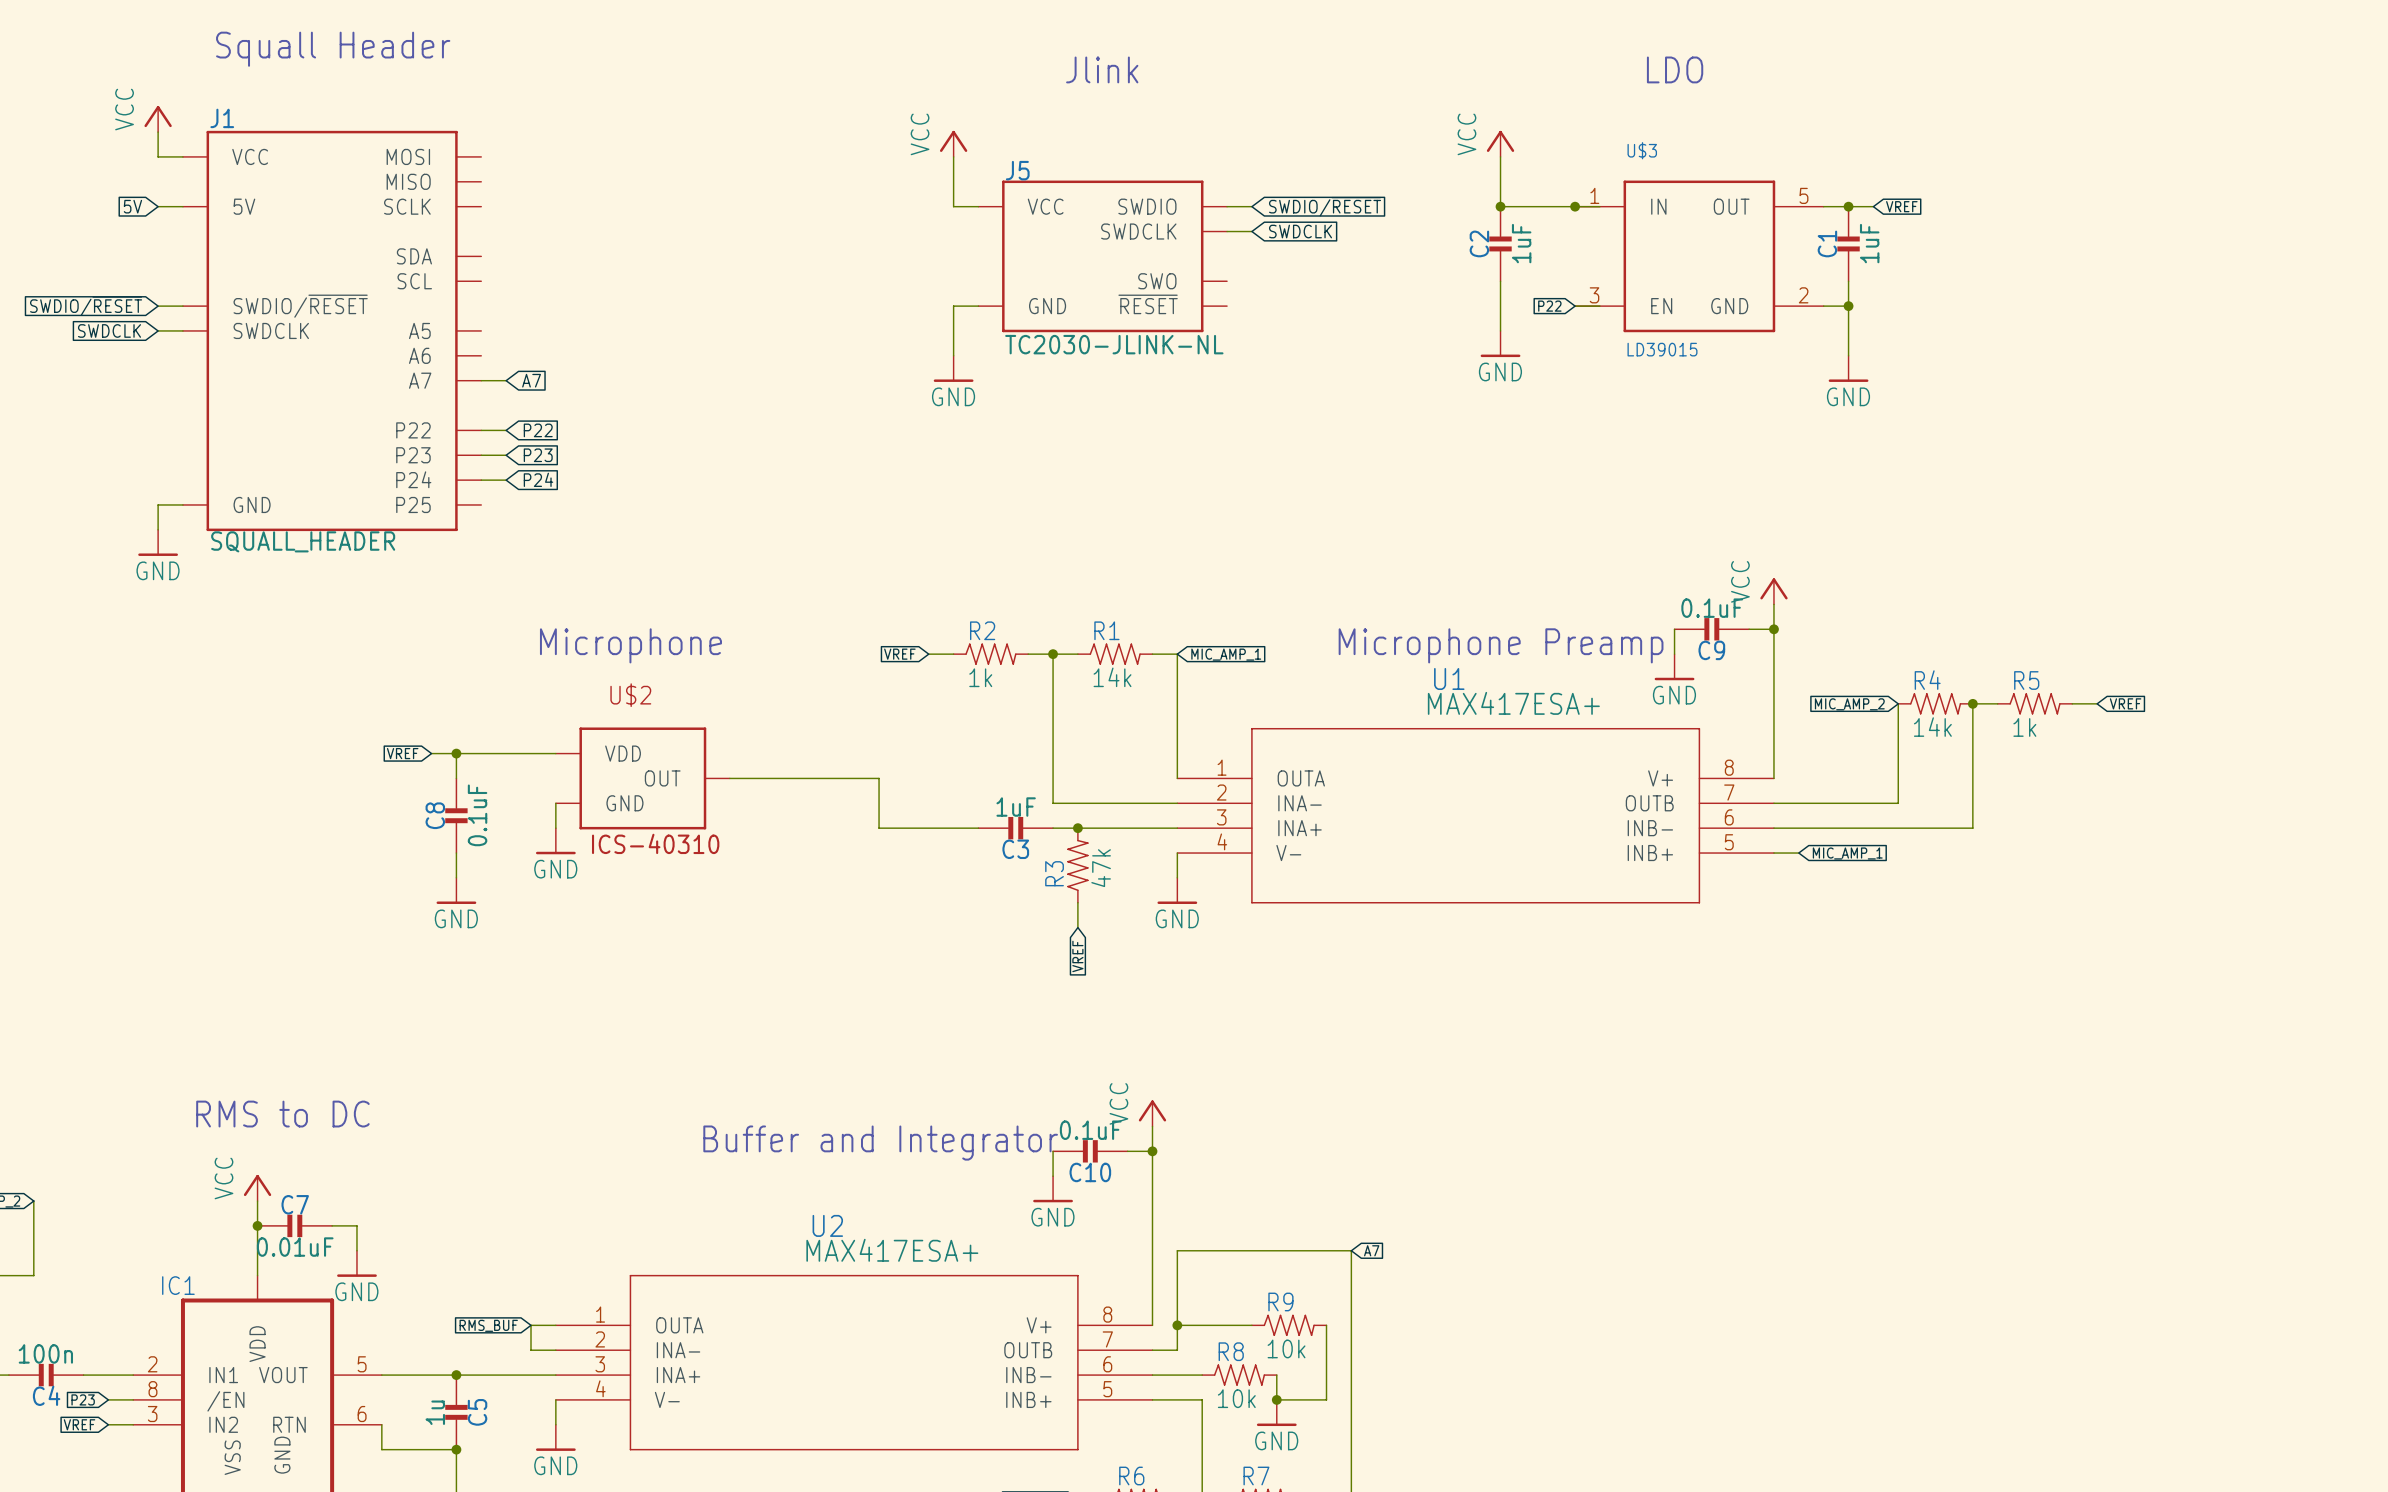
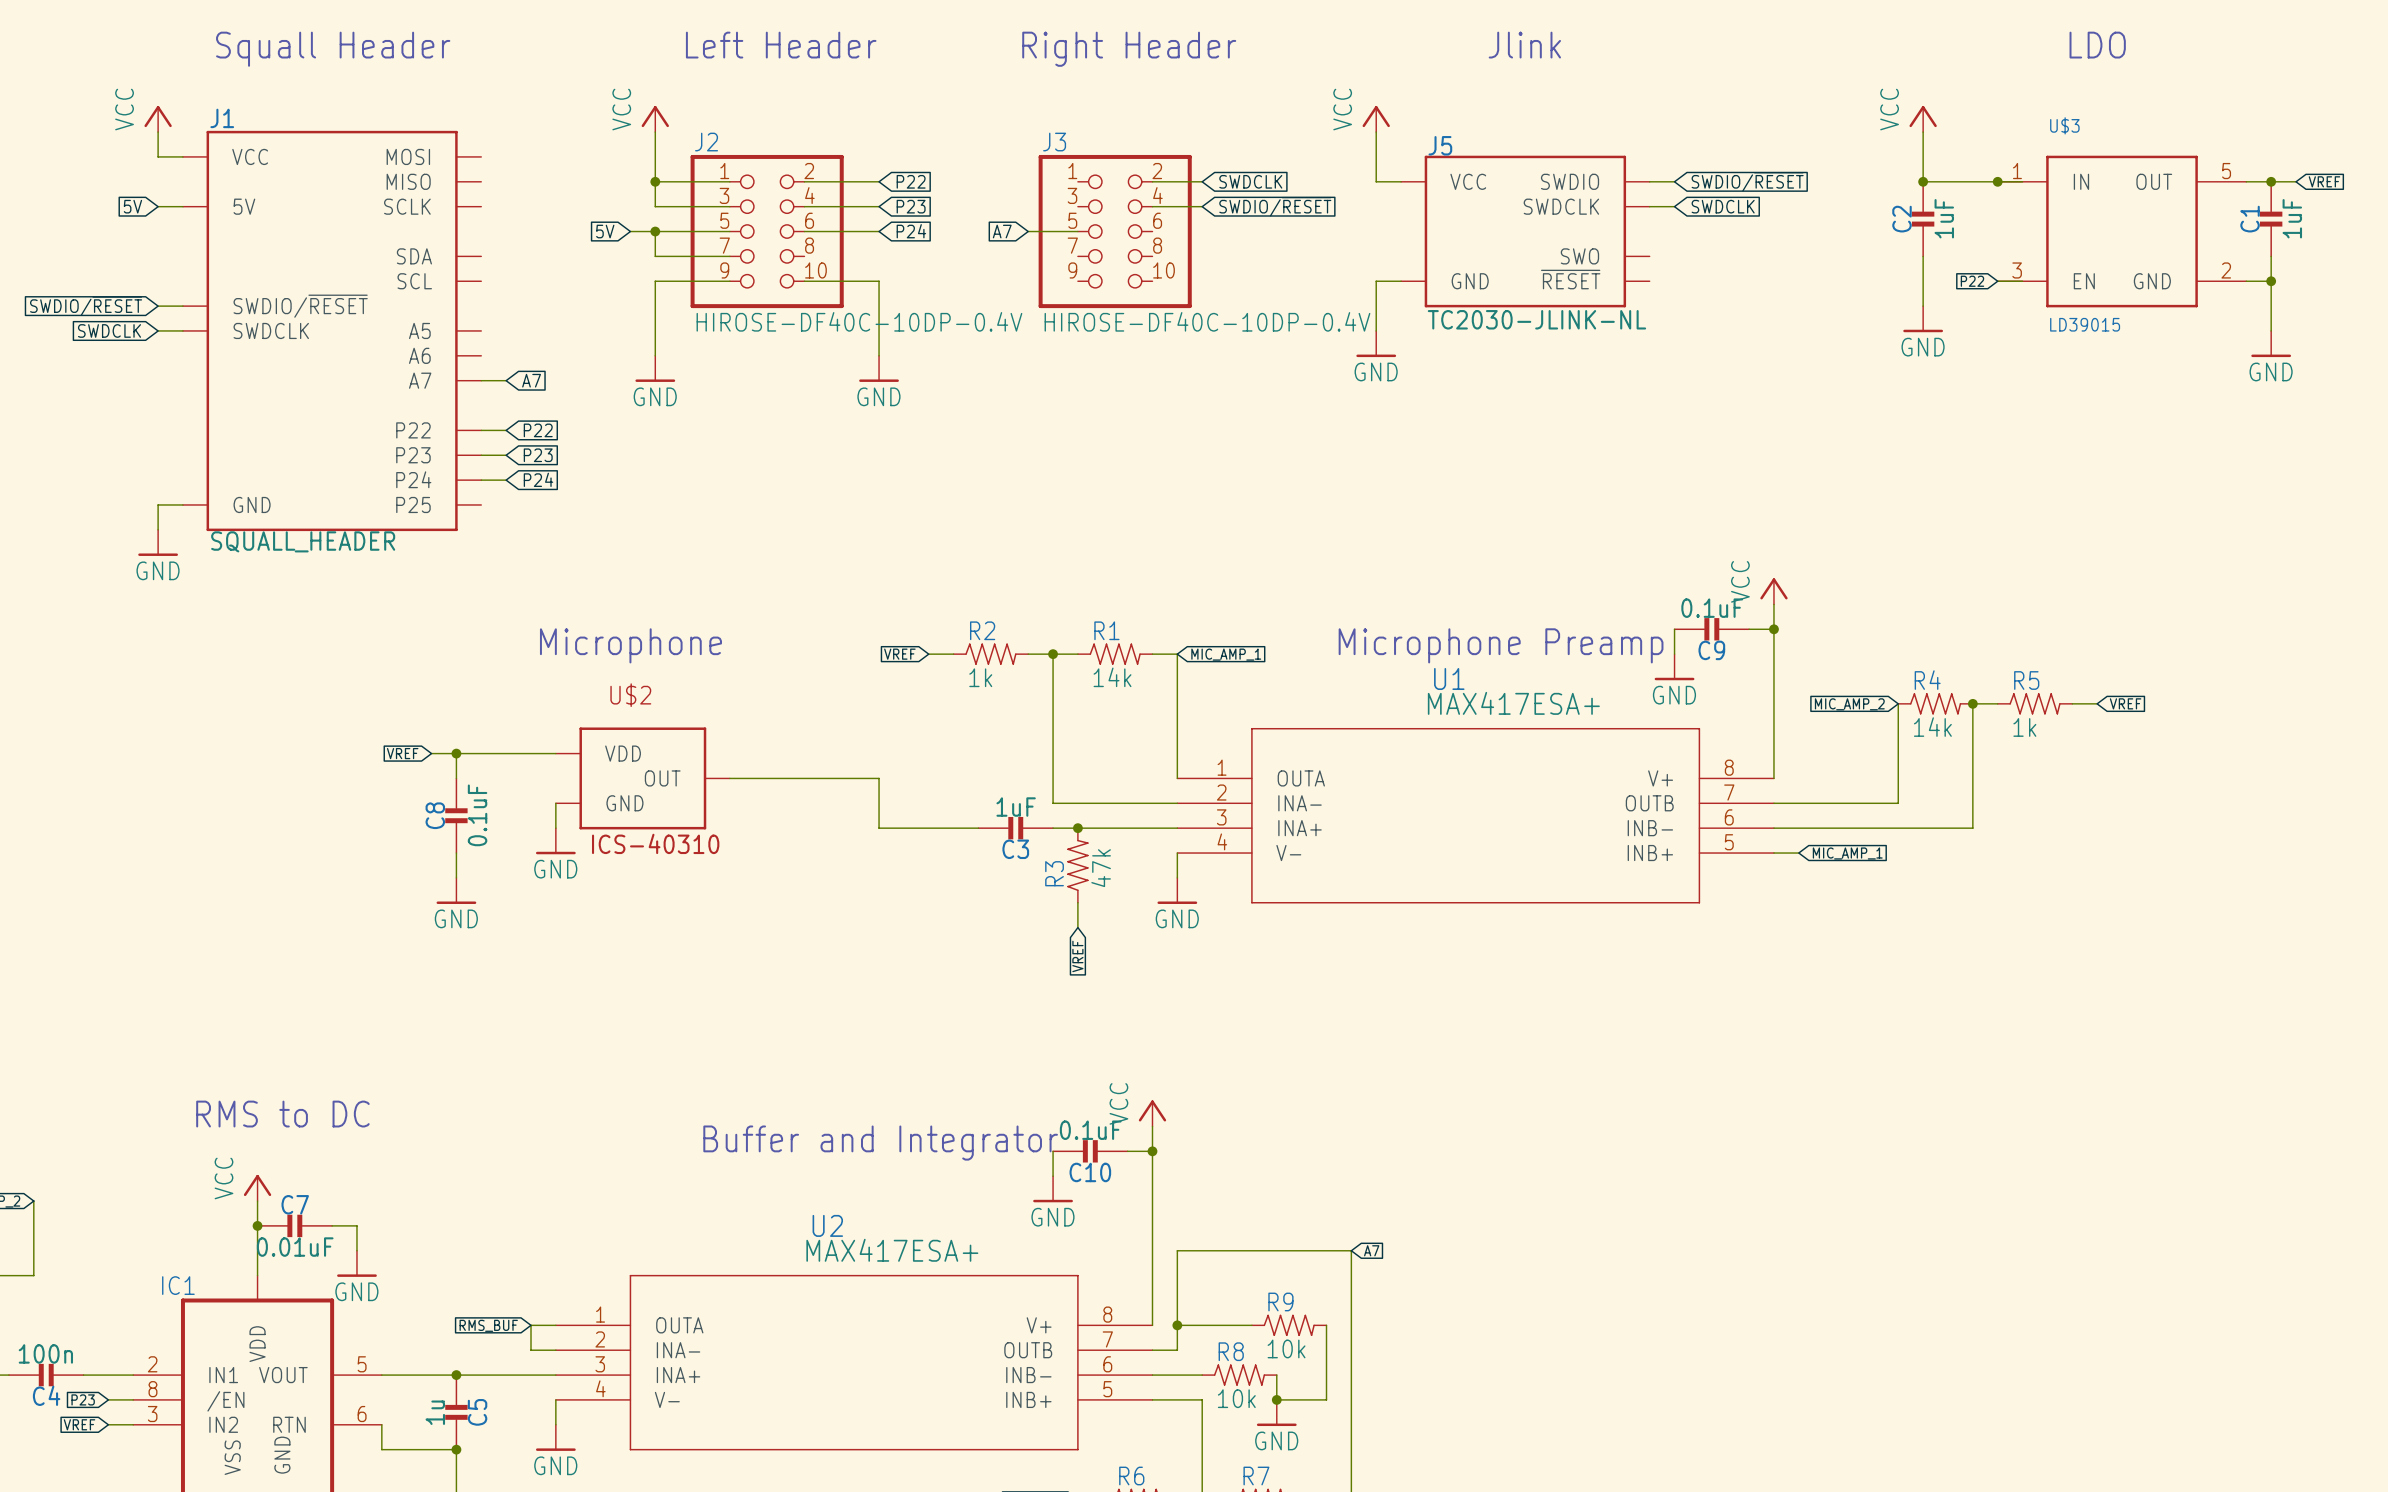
text: none -> Left Header (781, 45)
text: none -> Jlink (1524, 45)
text: none -> LDO (2097, 45)
text: none -> Right Header (1129, 49)
text: Jlink (1102, 69) -> none
text: LDO (1675, 69) -> none
power symbol: none -> VCC (655, 119)
power symbol: none -> VCC (1923, 119)
wire: none -> (655, 132) (655, 206) (729, 206)
wire: none -> (1376, 132) (1376, 181) (1401, 181)
wire: none -> (1923, 132) (1923, 181) (2022, 181)
power symbol: VCC (953, 143) -> none
power symbol position: VCC (1500, 143) -> VCC (1376, 119)
wire: (953, 156) (953, 206) (978, 206) -> none
wire: (1500, 156) (1500, 206) (1599, 206) -> none
wire: none -> (655, 181) (729, 181)
junction: none -> (655, 181)
wire: none -> (804, 181) (879, 181)
global label: none -> P22 (911, 181)
global label: none -> SWDIO/~{RESET} (1747, 181)
junction: none -> (1923, 181)
junction: none -> (1997, 181)
wire: none -> (2246, 181) (2296, 181)
junction: none -> (2271, 181)
global label: none -> VREF (2324, 181)
wire: none -> (804, 206) (879, 206)
global label: none -> P23 (911, 206)
wire: none -> (1152, 206) (1202, 206)
wire: (1227, 206) (1251, 206) -> none
global label position: SWDIO/~{RESET} (1325, 206) -> SWDIO/~{RESET} (1275, 206)
junction: (1500, 206) -> none
junction: (1575, 206) -> none
global label: none -> SWDCLK (1723, 206)
wire: (1823, 206) (1873, 206) -> none
junction: (1848, 206) -> none
global label: VREF (1901, 206) -> none
global label: none -> 5V (605, 231)
wire: none -> (630, 231) (729, 231)
wire: none -> (655, 231) (655, 256) (729, 256)
junction: none -> (655, 231)
J2: none -> HIROSE-DF40C-10DP-0.4V (767, 231)
wire: none -> (804, 231) (879, 231)
global label: none -> P24 (911, 231)
global label: none -> A7 (1002, 231)
wire: none -> (1028, 231) (1077, 231)
J3: none -> HIROSE-DF40C-10DP-0.4V (1115, 231)
wire: (1227, 231) (1251, 231) -> none
global label position: SWDCLK (1300, 231) -> SWDCLK (1250, 181)
C2 position: (1500, 243) -> (1923, 219)
C1 position: (1848, 243) -> (2271, 219)
J5 position: (1102, 256) -> (1525, 231)
U$3 position: (1699, 256) -> (2122, 231)
wire: none -> (1923, 256) (1923, 306)
wire: none -> (2271, 256) (2271, 330)
wire: none -> (729, 281) (655, 281) (655, 355)
wire: none -> (804, 281) (879, 281) (879, 355)
wire: none -> (1401, 281) (1376, 281) (1376, 330)
wire: (1500, 281) (1500, 330) -> none
wire: (1848, 281) (1848, 355) -> none
global label: none -> P22 (1972, 281)
wire: none -> (2246, 281) (2271, 281)
junction: none -> (2271, 281)
wire: (978, 306) (953, 306) (953, 355) -> none
global label: P22 (1549, 306) -> none
wire: (1823, 306) (1848, 306) -> (1997, 281) (2022, 281)
junction: (1848, 306) -> none
power symbol position: GND (1500, 344) -> GND (1376, 344)
power symbol: none -> GND (2271, 344)
power symbol: none -> GND (655, 368)
power symbol position: GND (953, 368) -> GND (879, 368)
power symbol position: GND (1848, 368) -> GND (1923, 319)

